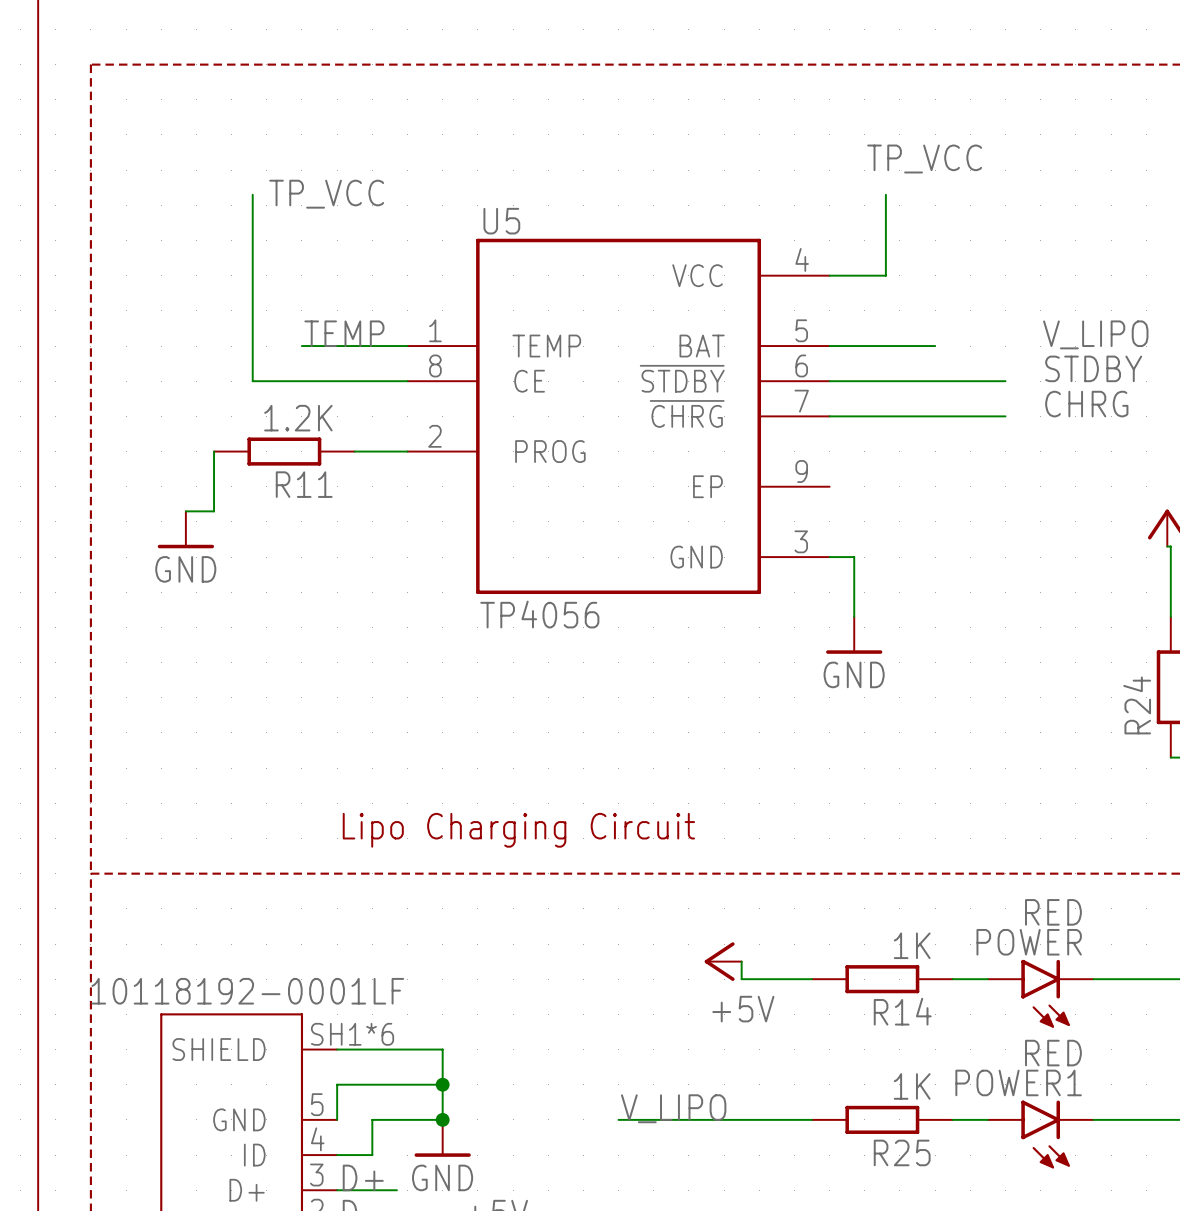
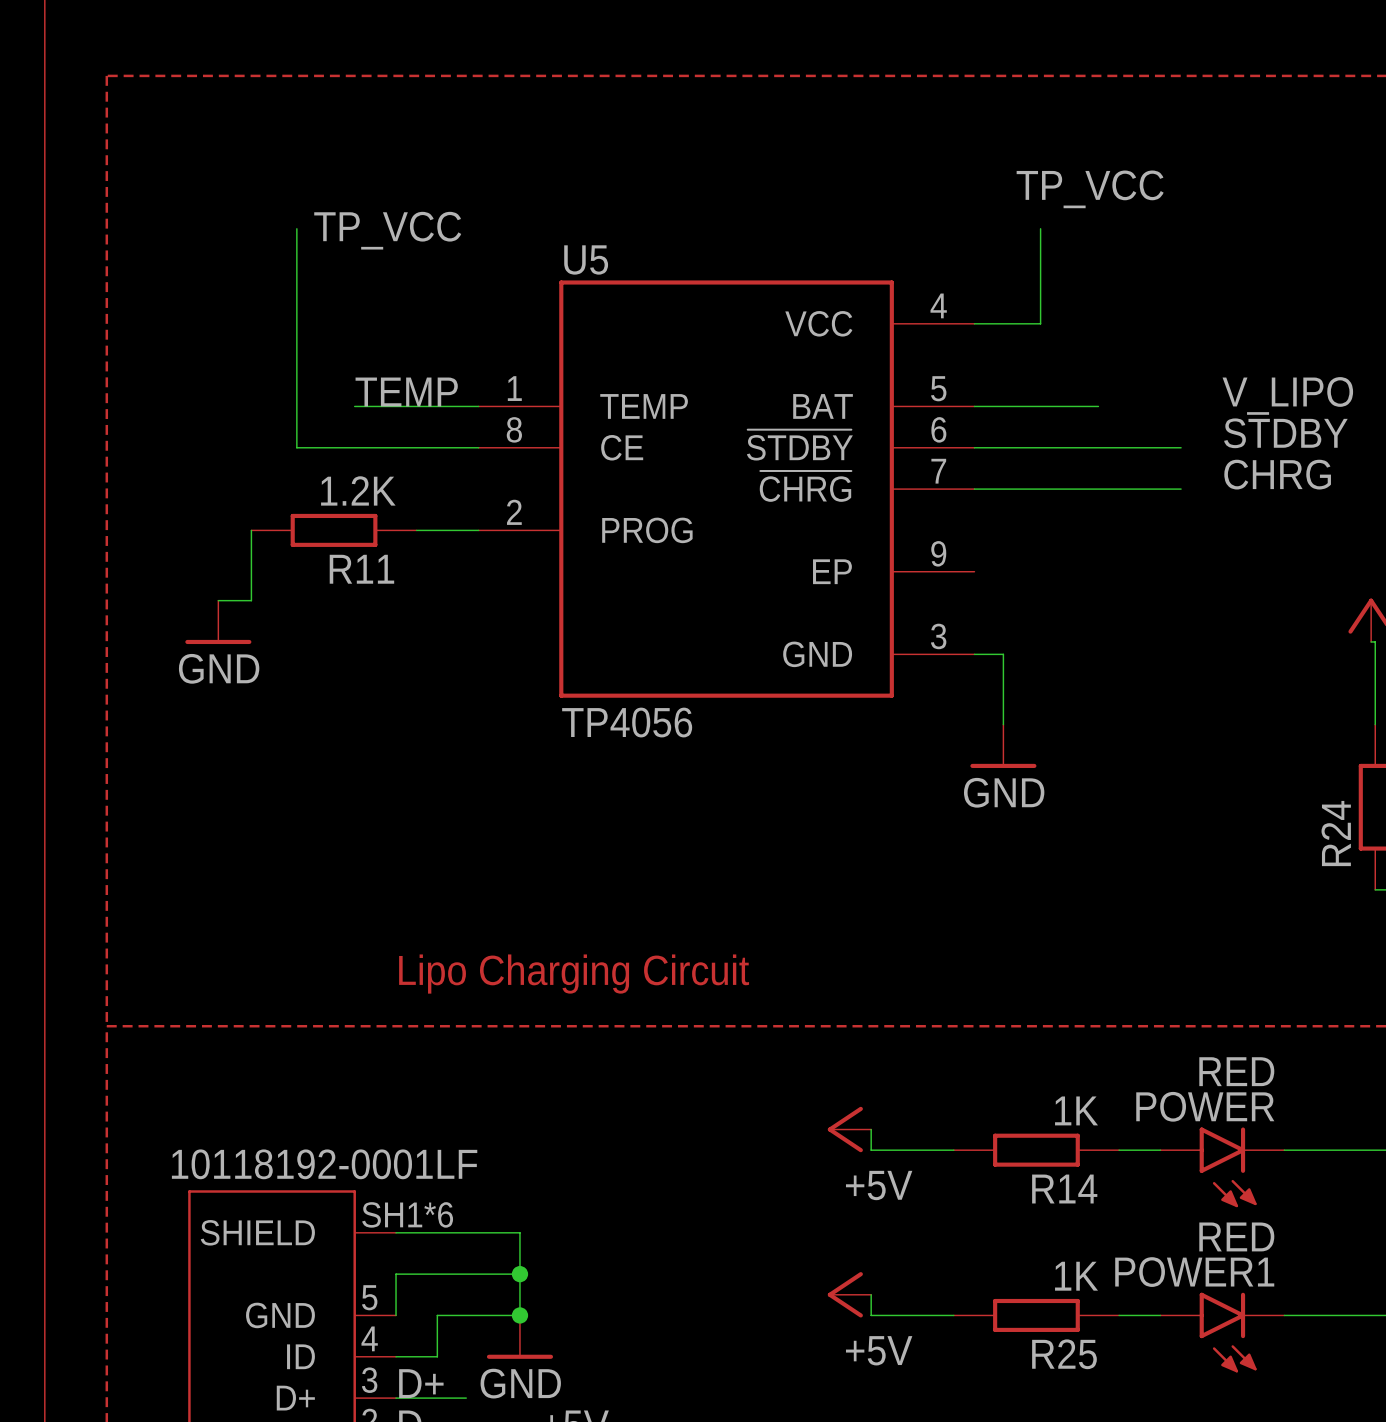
power symbol: none -> +5V (849, 1294)
label: V_LIPO (673, 1108) -> none
wire: (618, 1119) (741, 1119) -> (871, 1294) (871, 1315)

